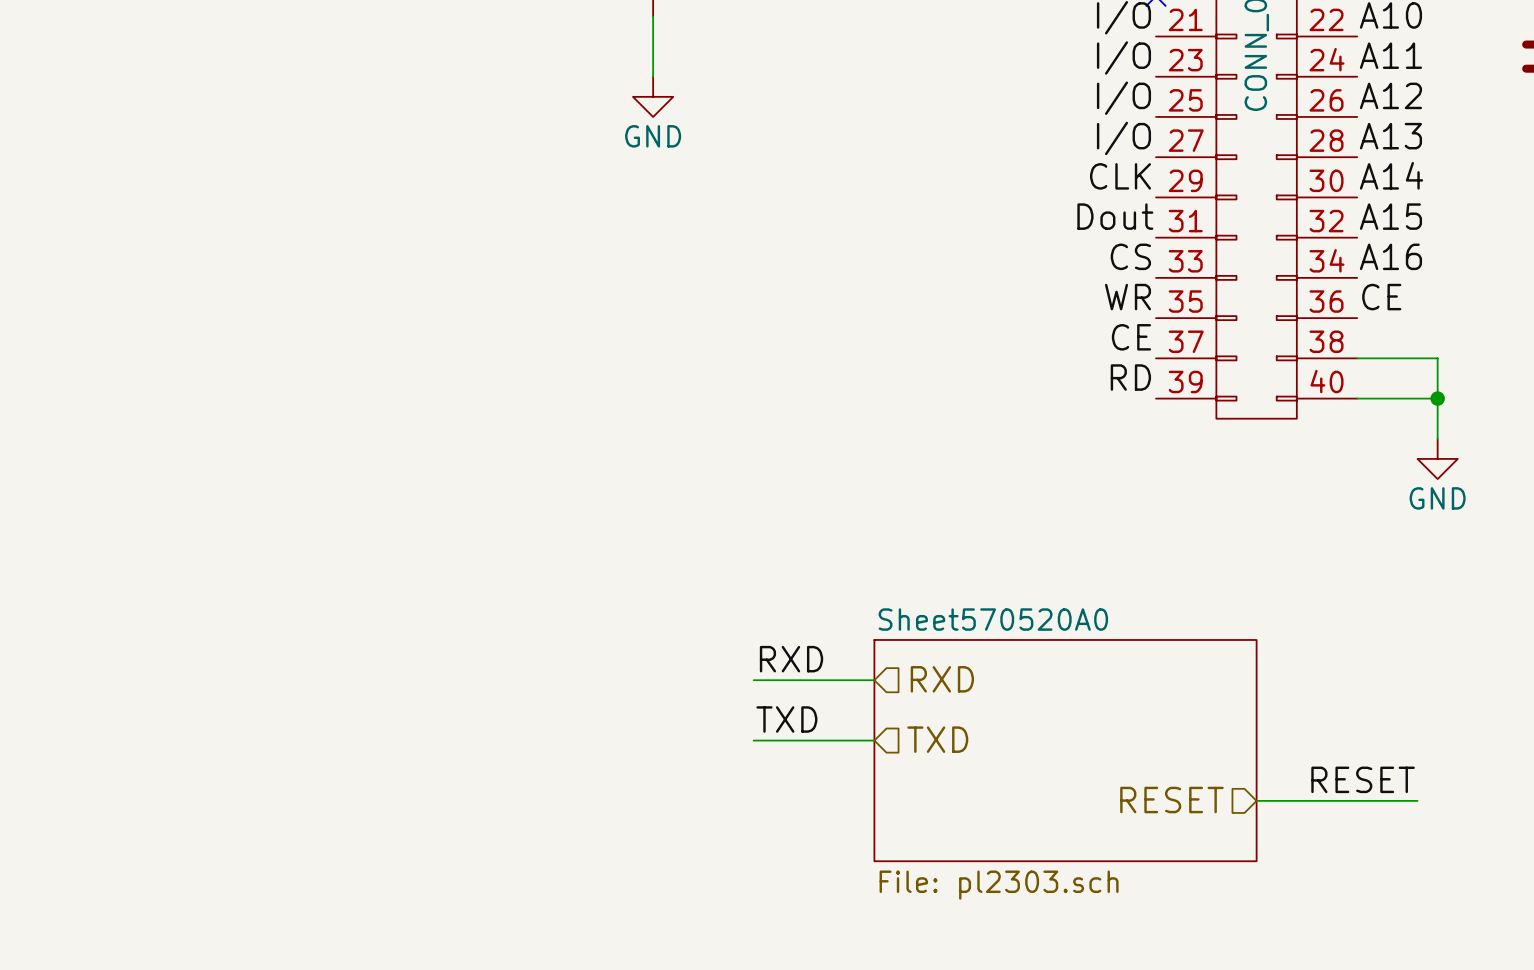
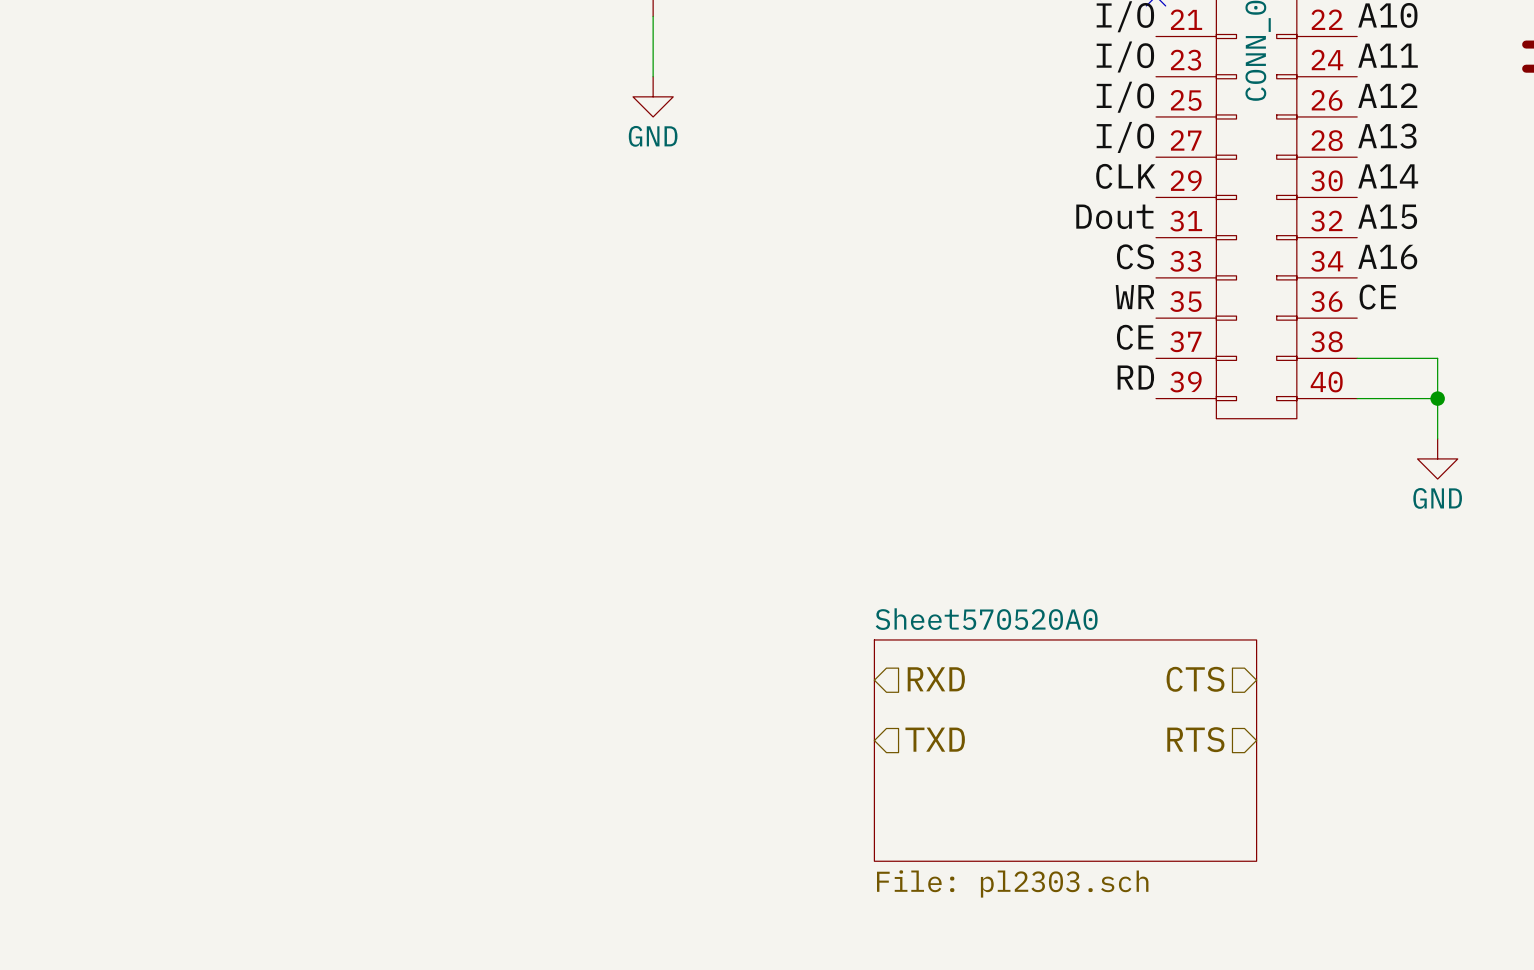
label: RXD (791, 659) -> none
hierarchical label: none -> CTS (1195, 679)
wire: (753, 680) (874, 680) -> none
label: TXD (786, 719) -> none
hierarchical label: none -> RTS (1195, 739)
wire: (753, 740) (874, 740) -> none
label: RESET (1363, 779) -> none
hierarchical label: RESET (1171, 800) -> none
wire: (1256, 800) (1417, 800) -> none

